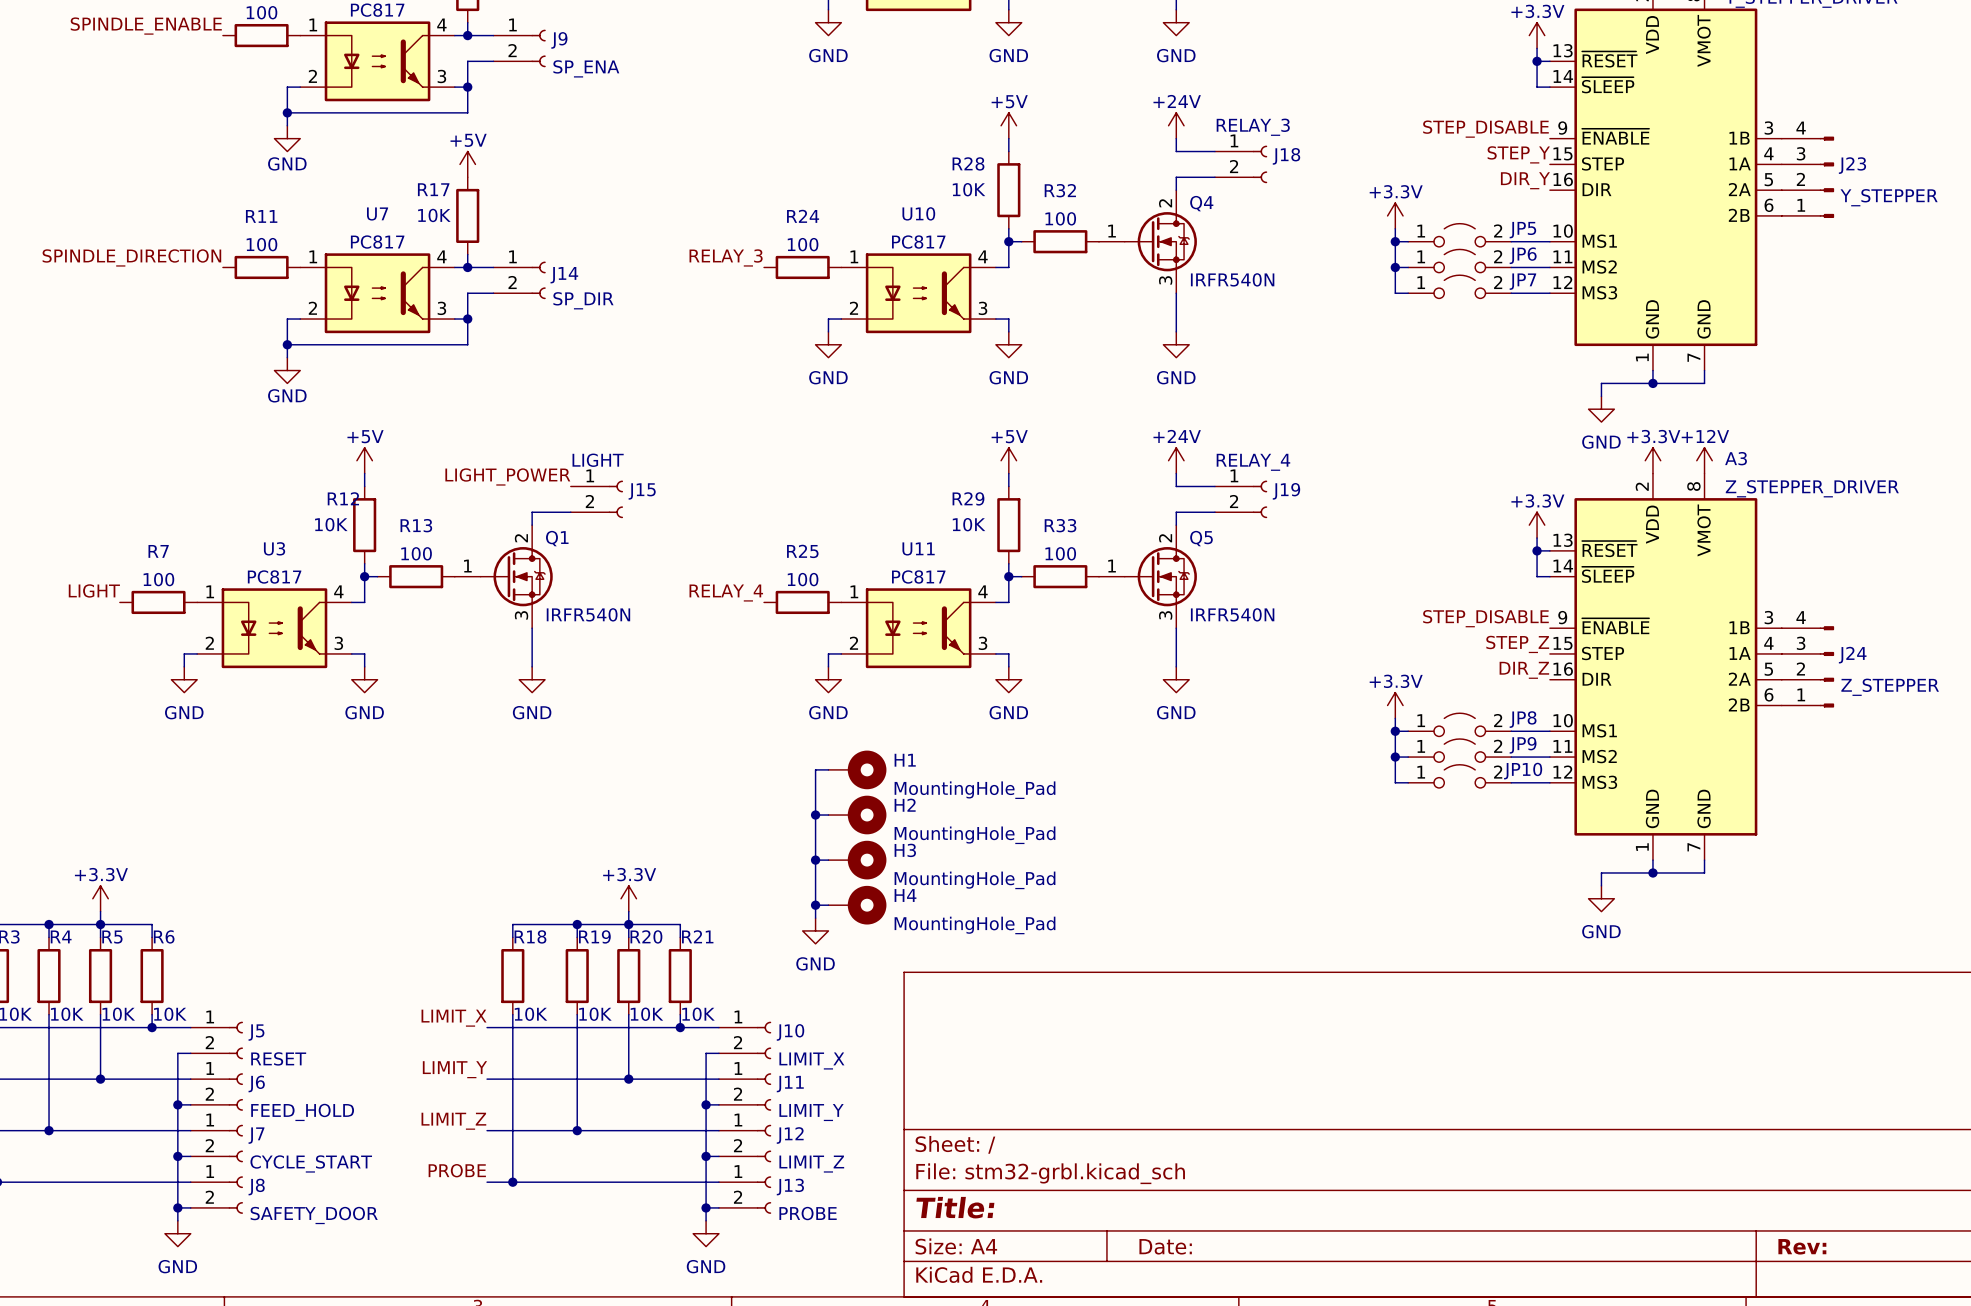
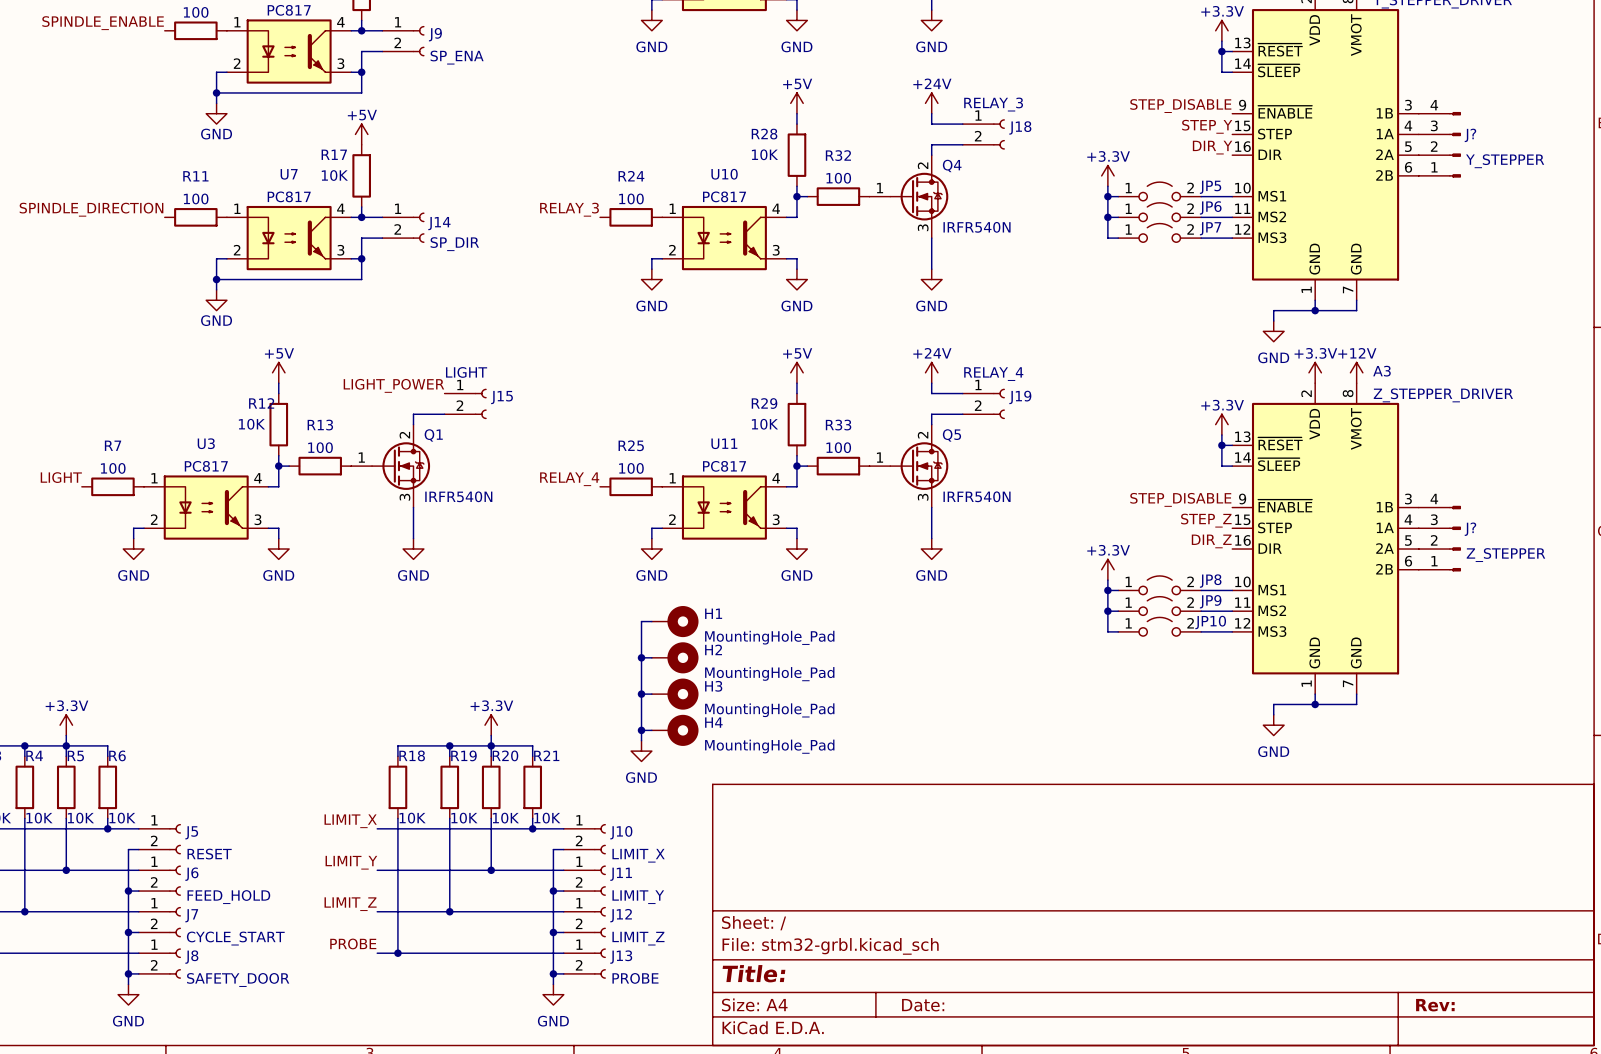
J23 name: J23 (1852, 165) -> J? (1470, 135)
J24 name: J24 (1852, 655) -> J? (1470, 529)

